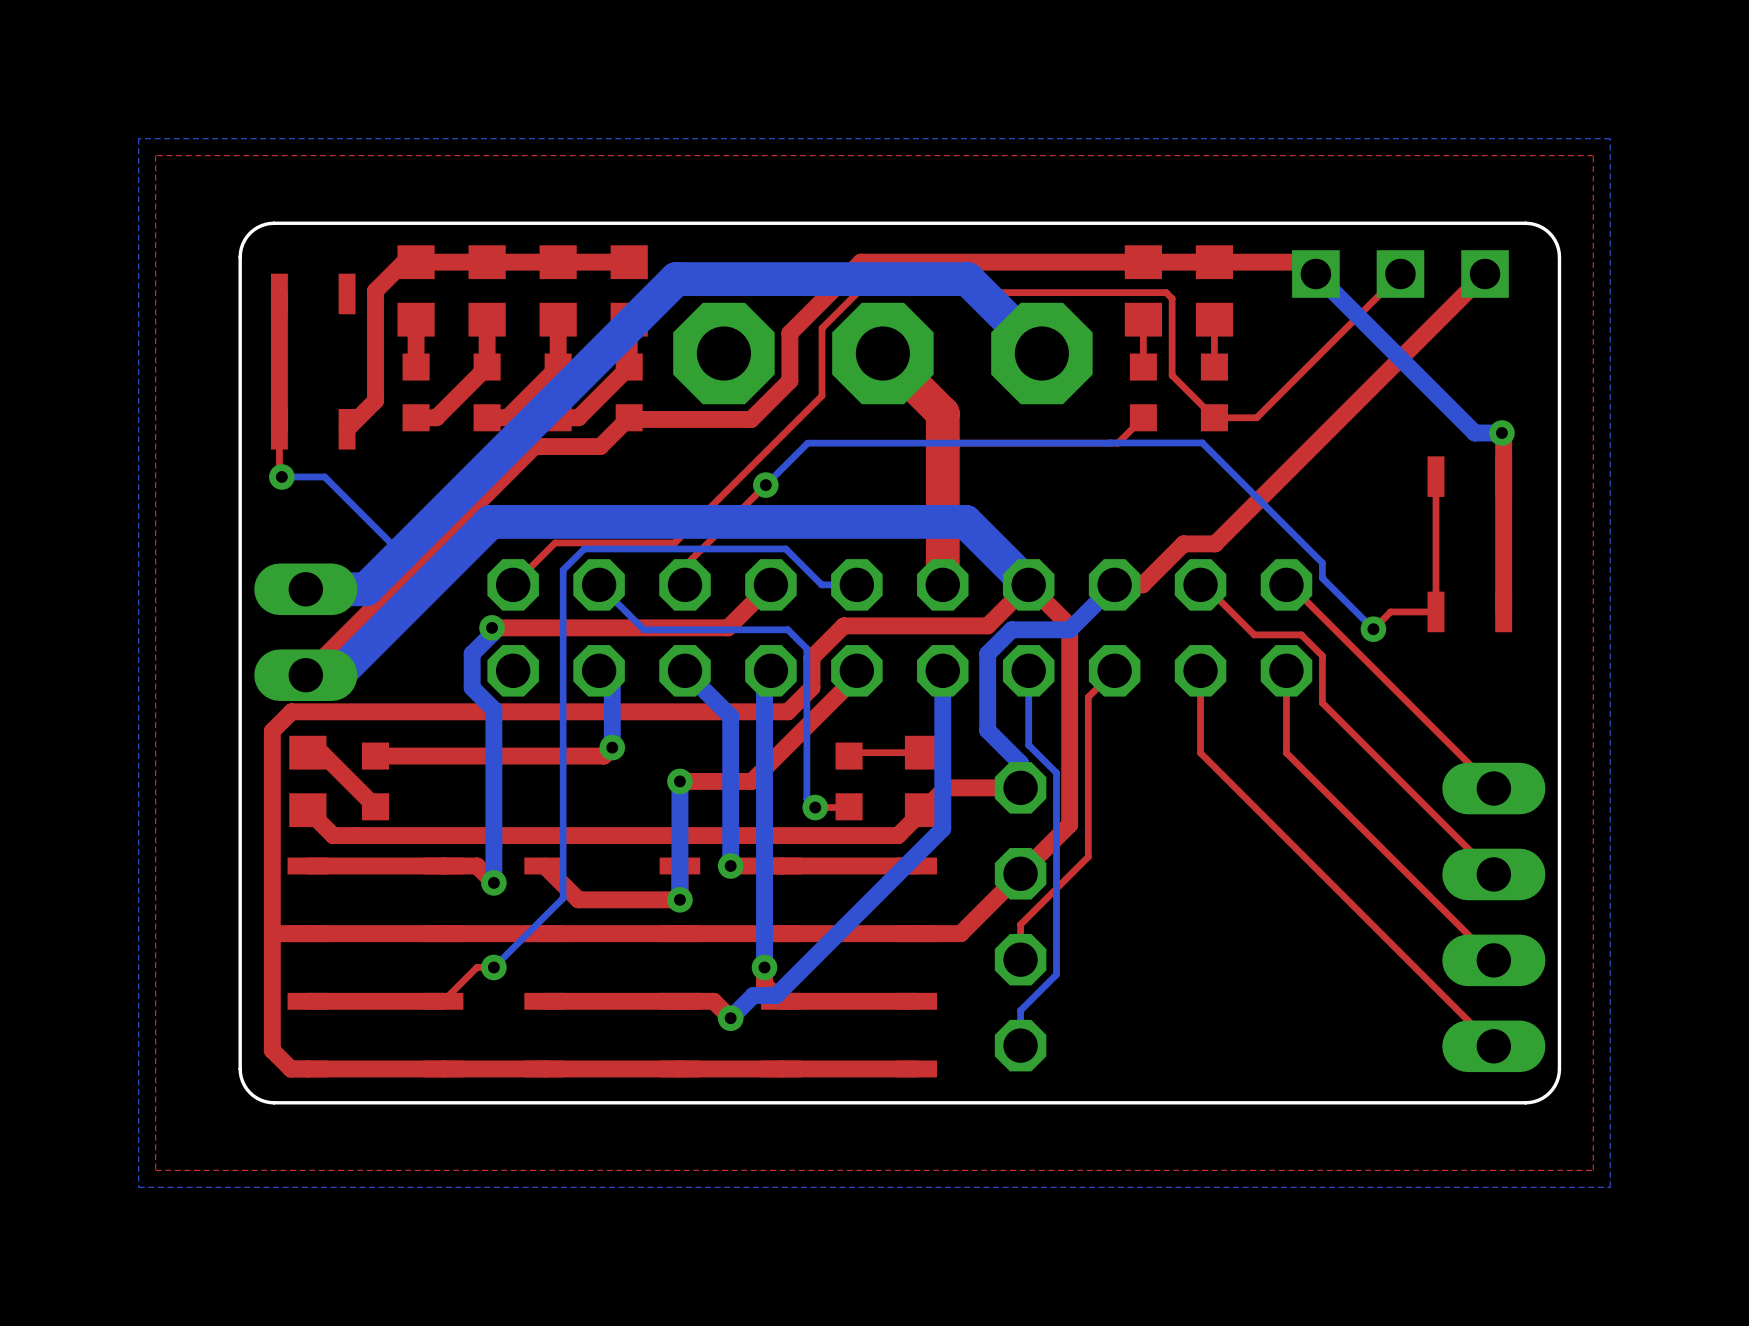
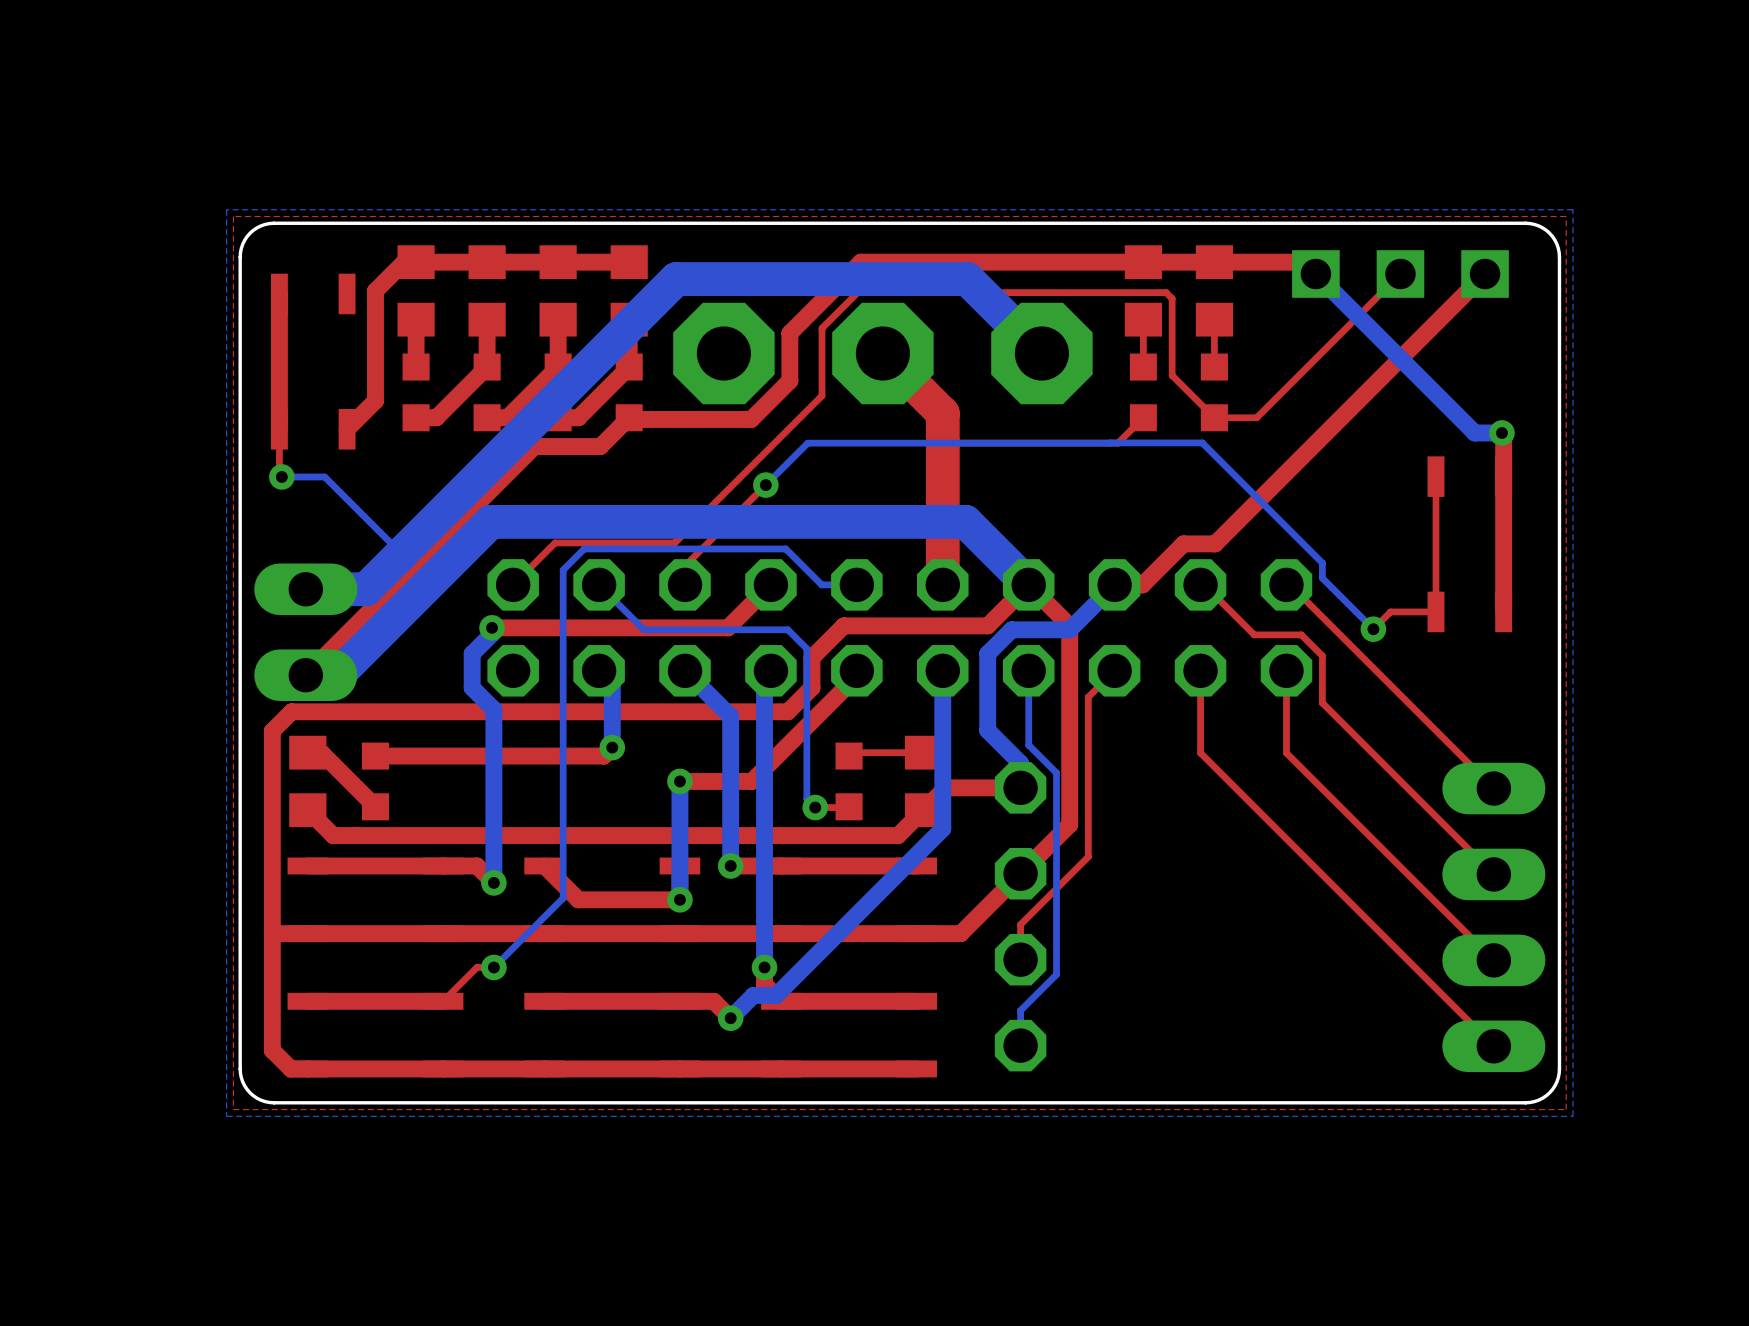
bottom zone outline: (1610, 138) (138, 138) (138, 1187) (1610, 1187) (1610, 138) -> (1573, 209) (1573, 1116) (226, 1116) (226, 209) (1573, 209)
top zone outline: (1593, 155) (155, 155) (155, 1170) (1593, 1170) (1593, 155) -> (1566, 216) (1566, 1109) (233, 1109) (233, 216) (1566, 216)

